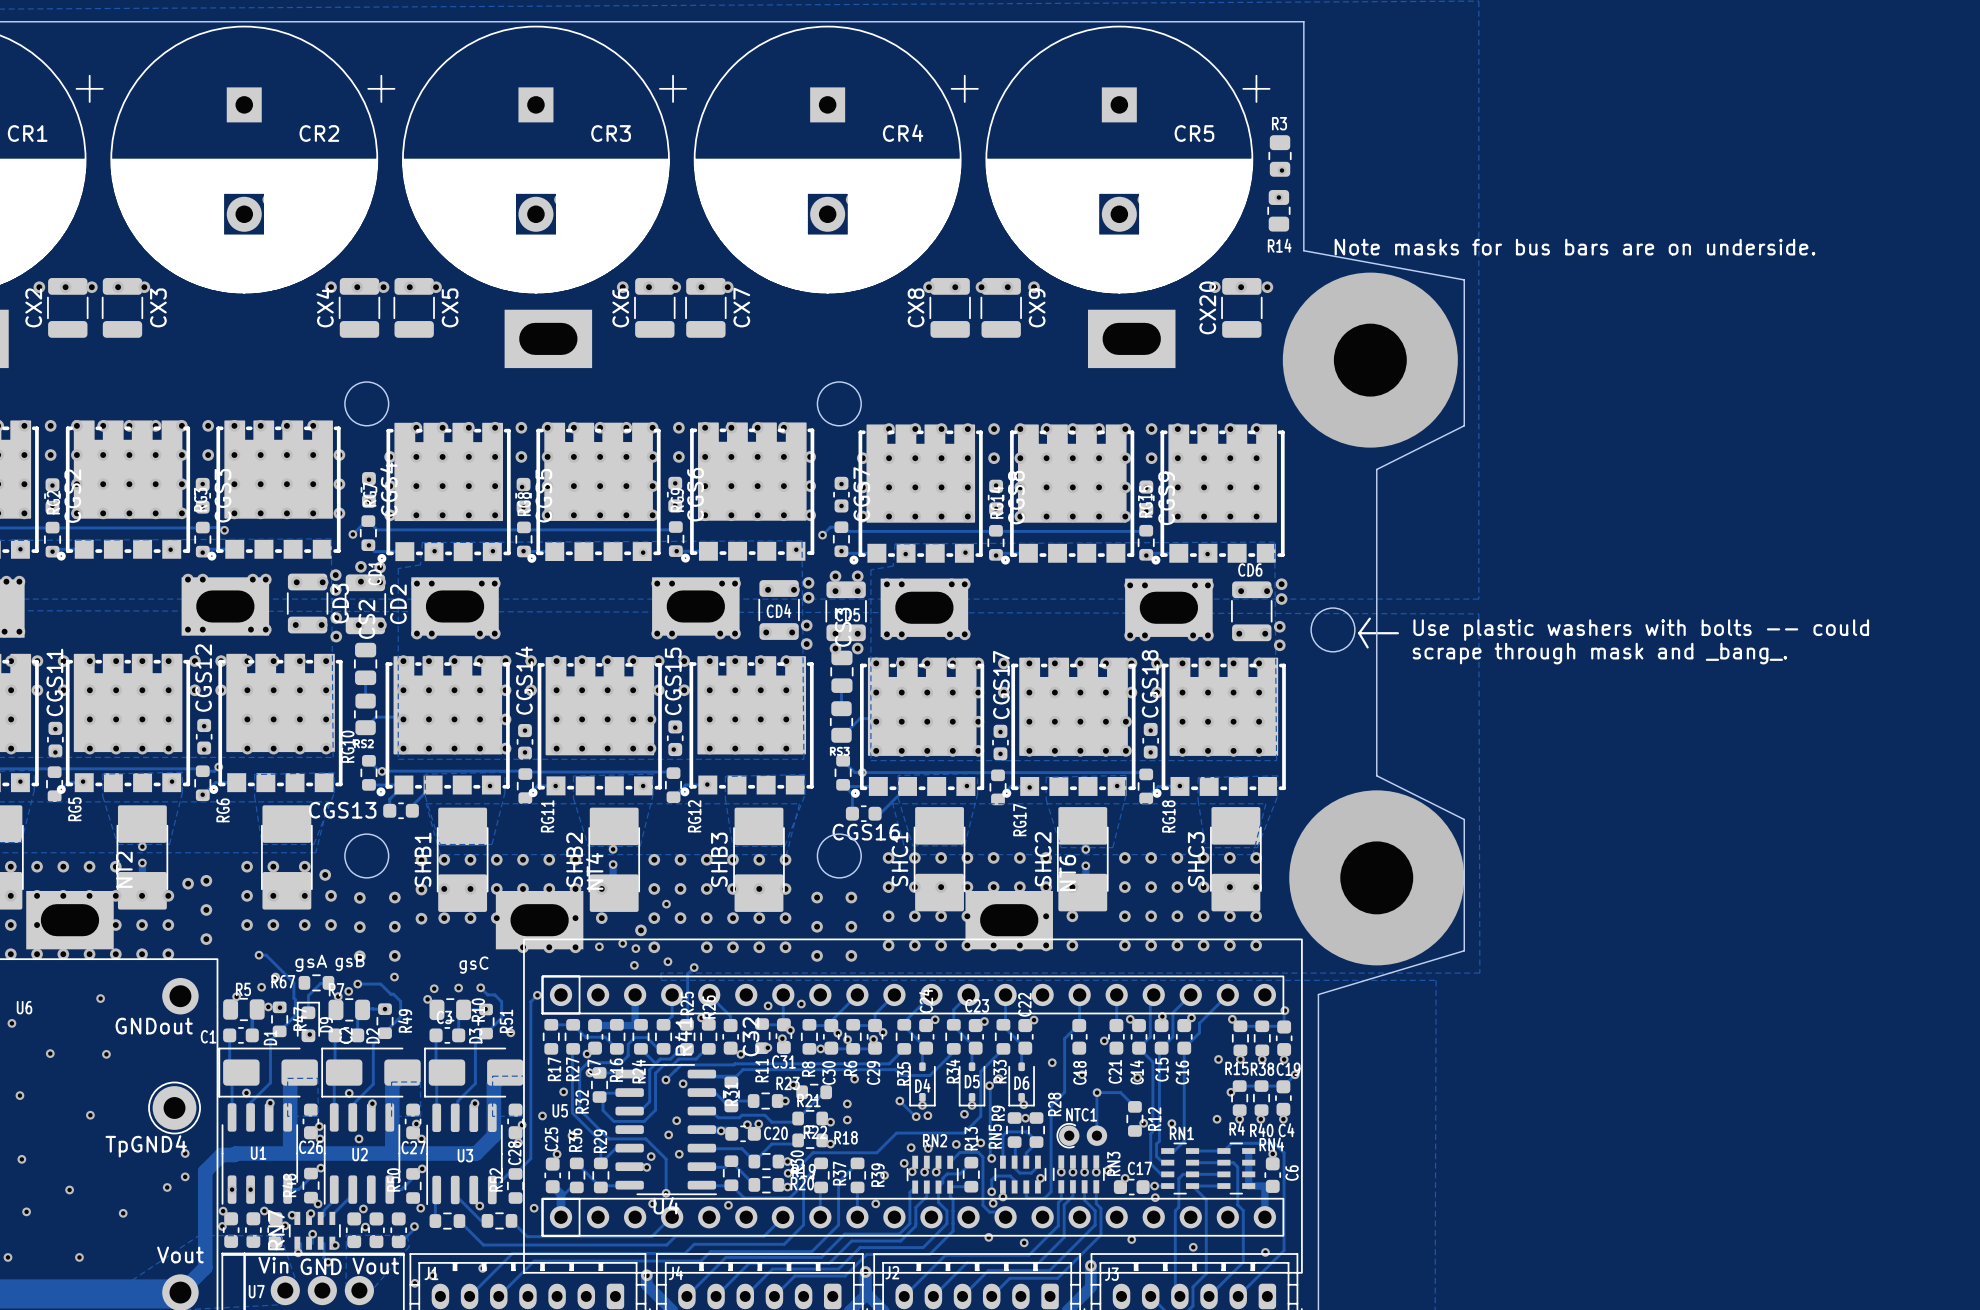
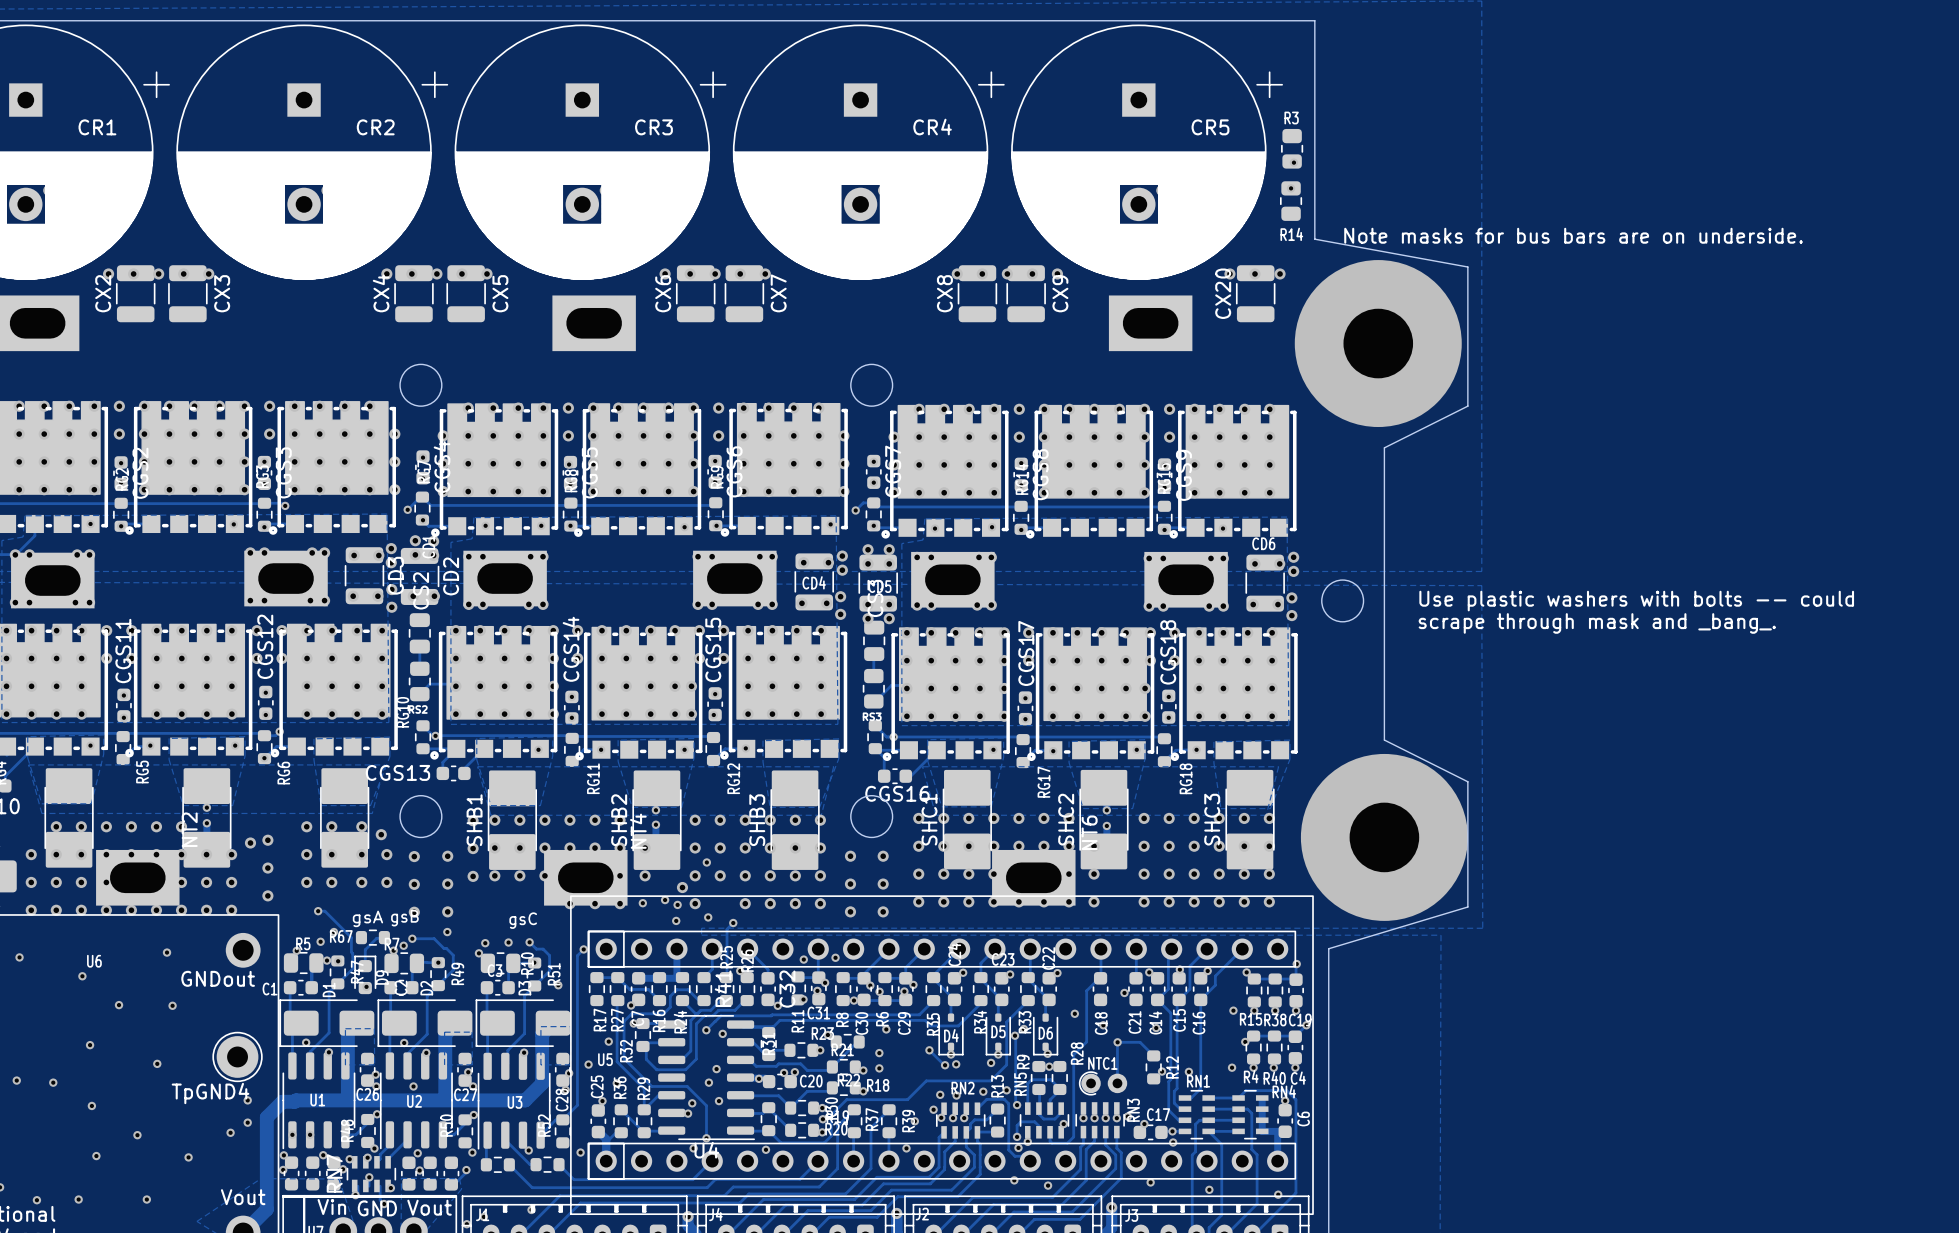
line: (1369, 618) (1359, 633) -> none
line: (1359, 633) (1367, 647) -> none
line: (1359, 633) (1397, 633) -> none

